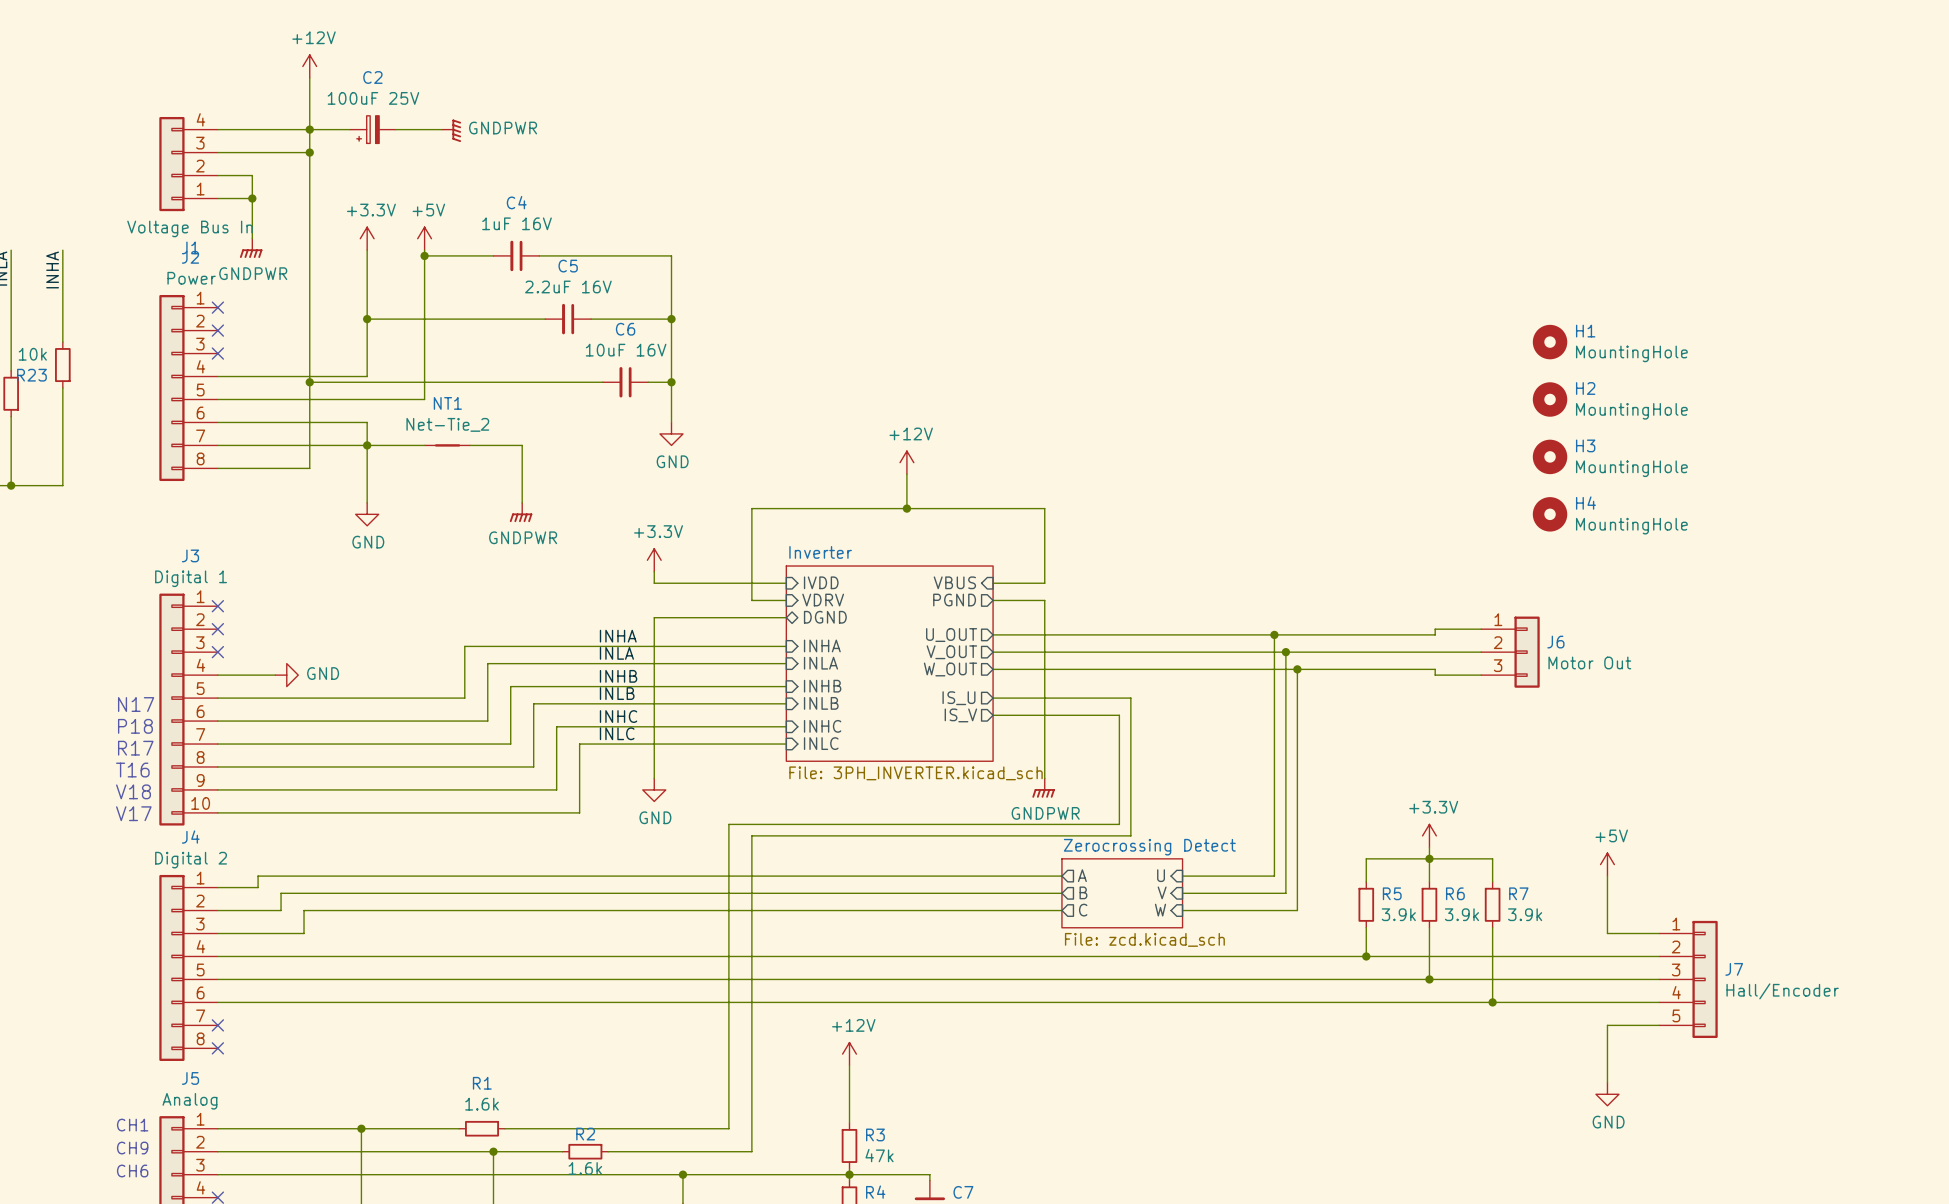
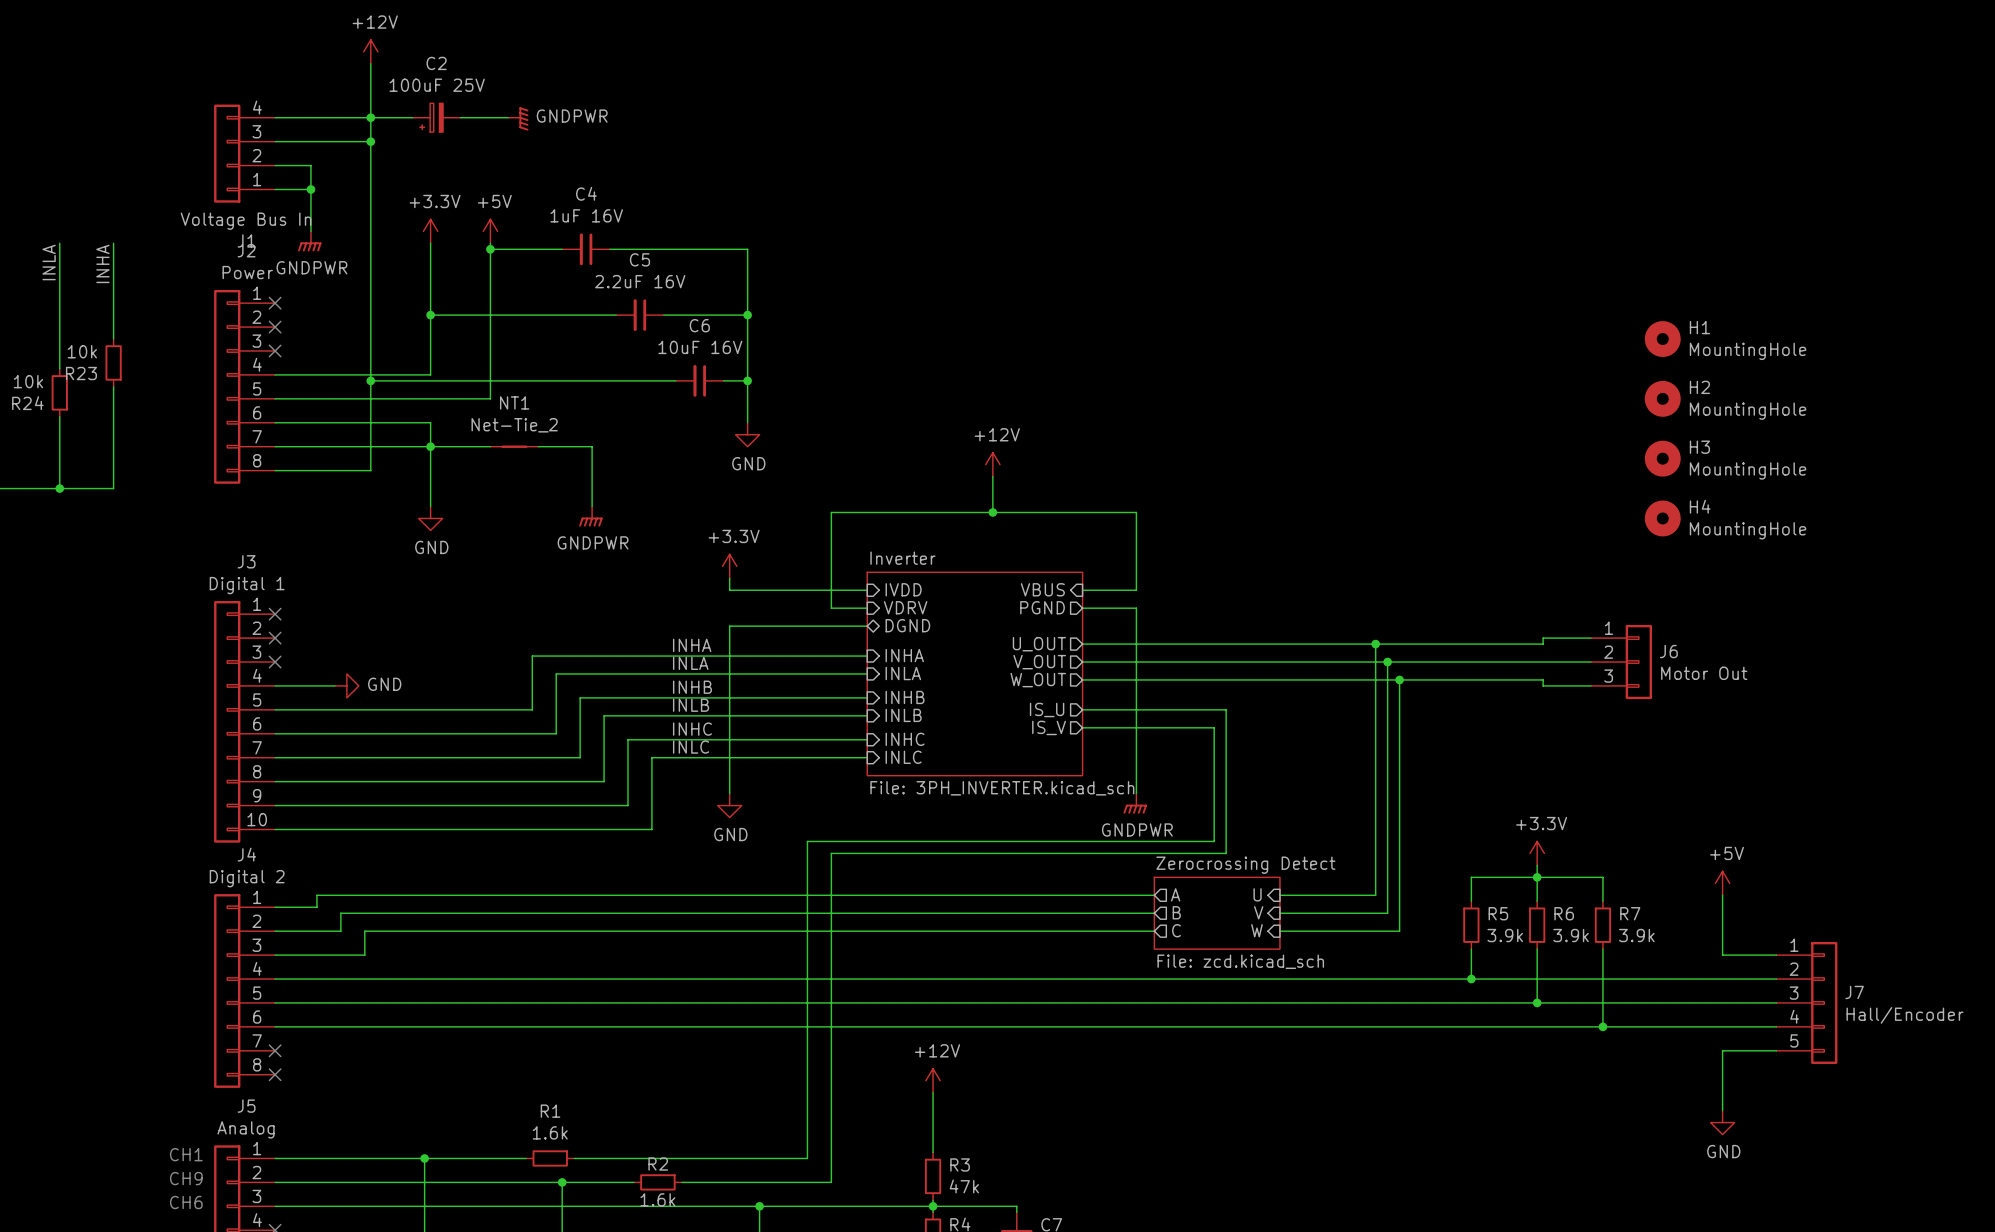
text: N17 (136, 704) -> none
text: P18 (135, 726) -> none
text: R17 (135, 748) -> none
text: T16 (132, 770) -> none
text: V18 (133, 791) -> none
text: V17 (133, 813) -> none

